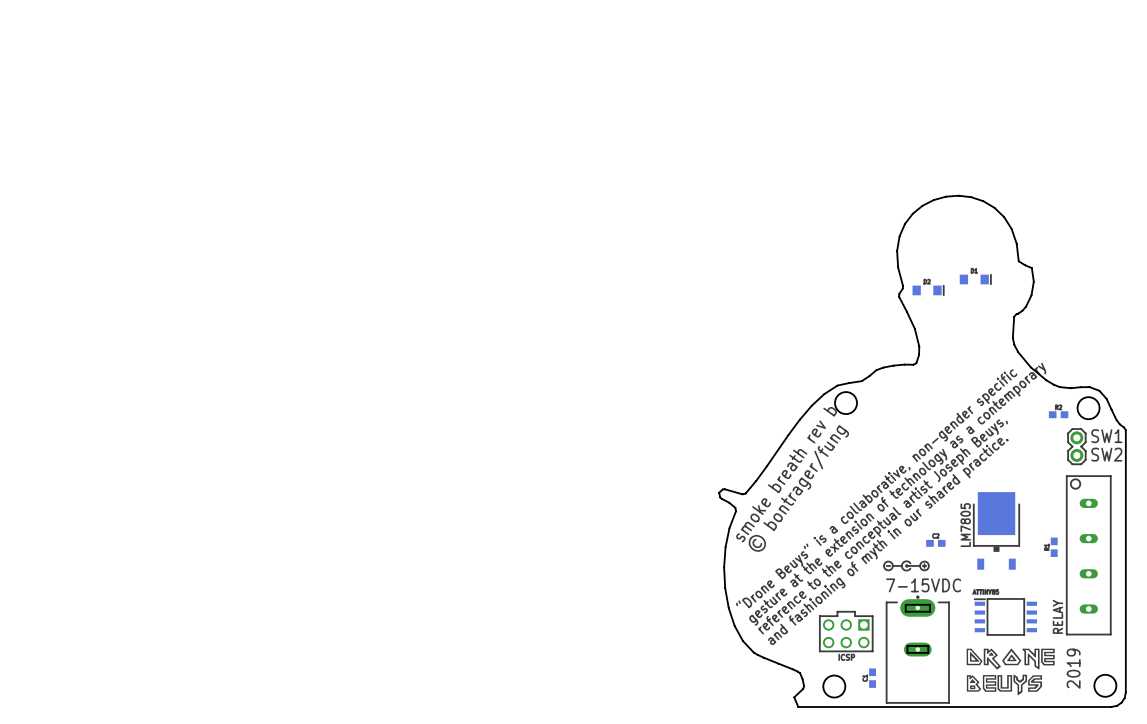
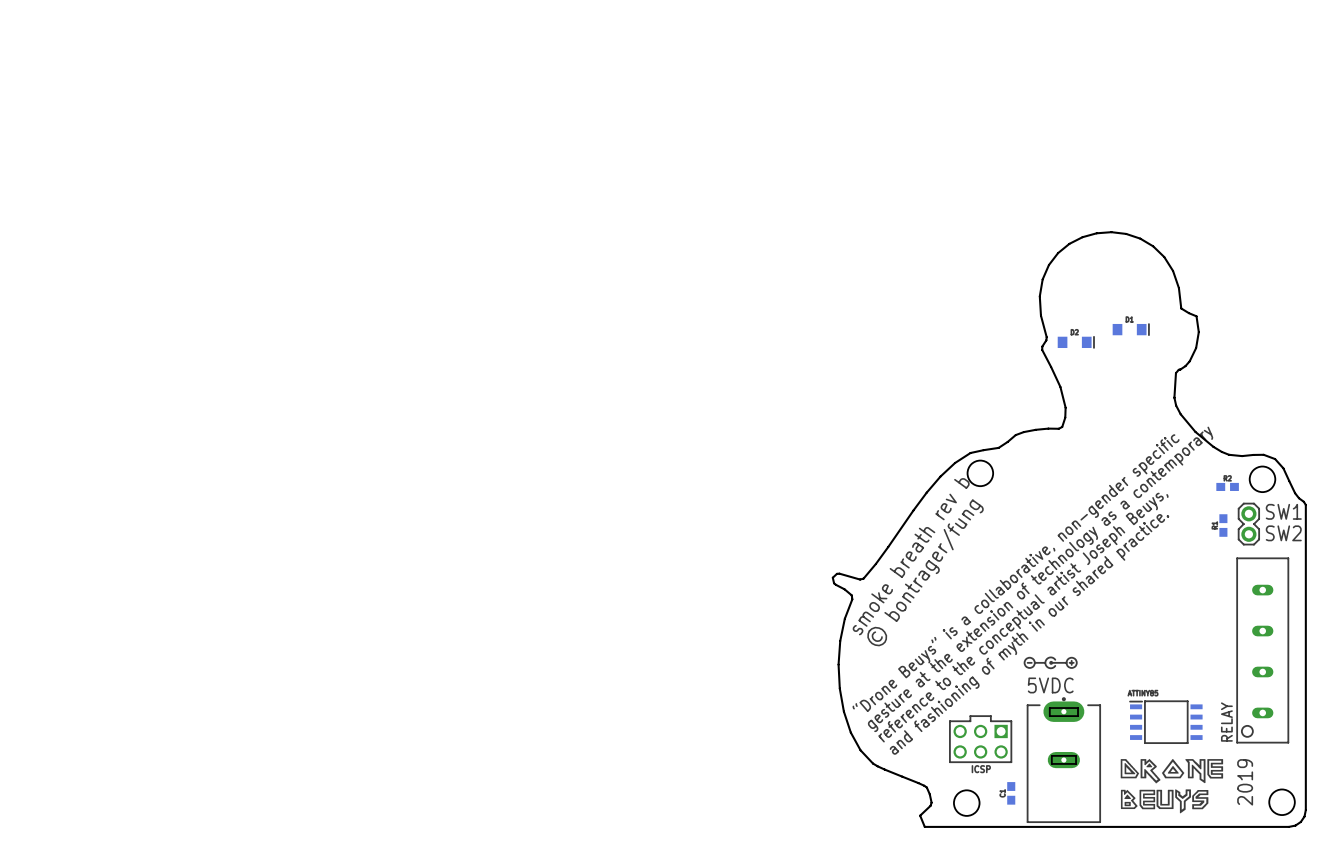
RELAY footprint: [1066, 475, 1112, 635] -> [1236, 557, 1289, 744]
LM7805: (996, 530) -> none
part: (935, 543) -> none
part position: (1054, 547) -> (1223, 525)
text: 7-15VDC (923, 585) -> 5VDC (1050, 685)

